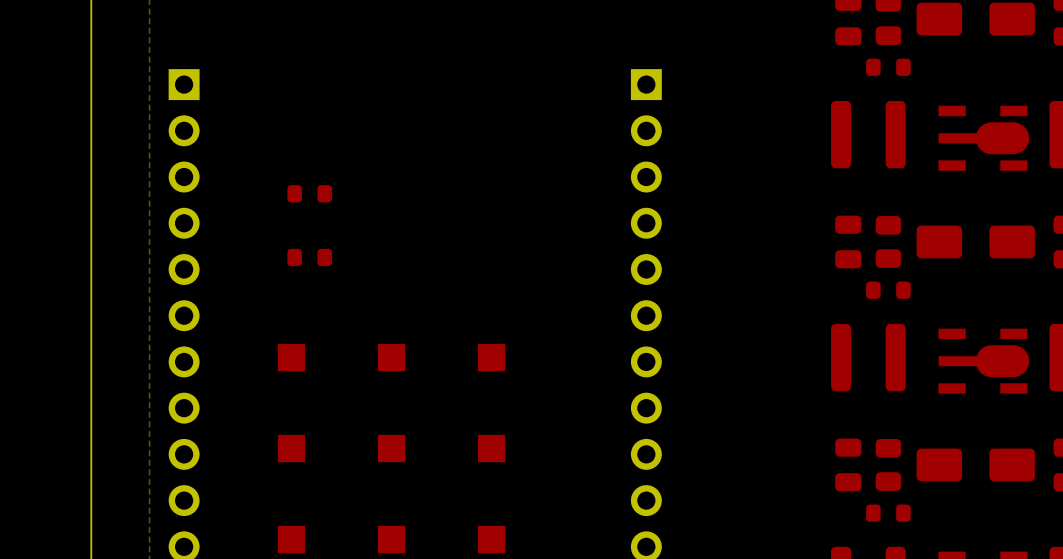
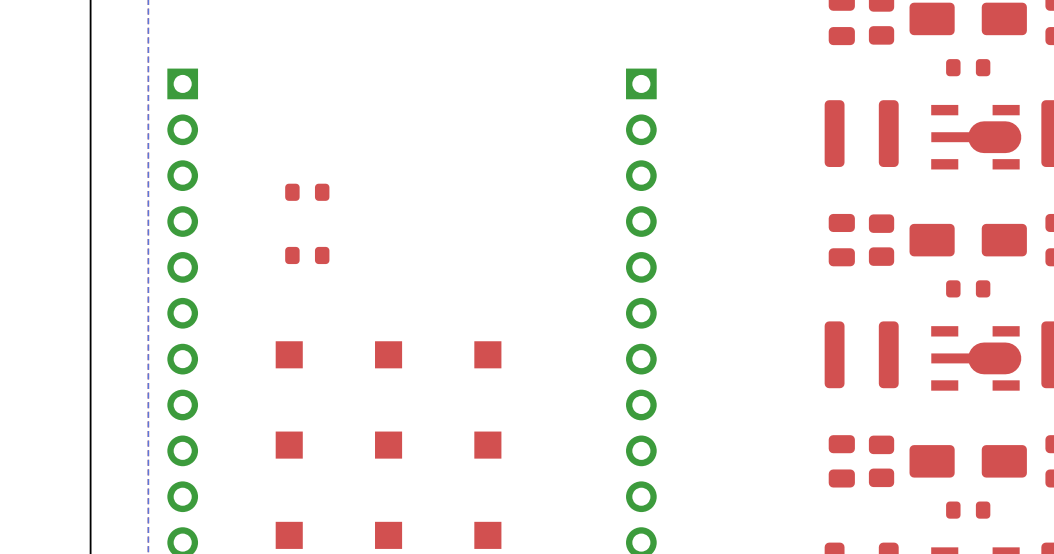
part position: (888, 67) -> (968, 67)
part position: (888, 290) -> (968, 288)
part position: (888, 513) -> (968, 510)

